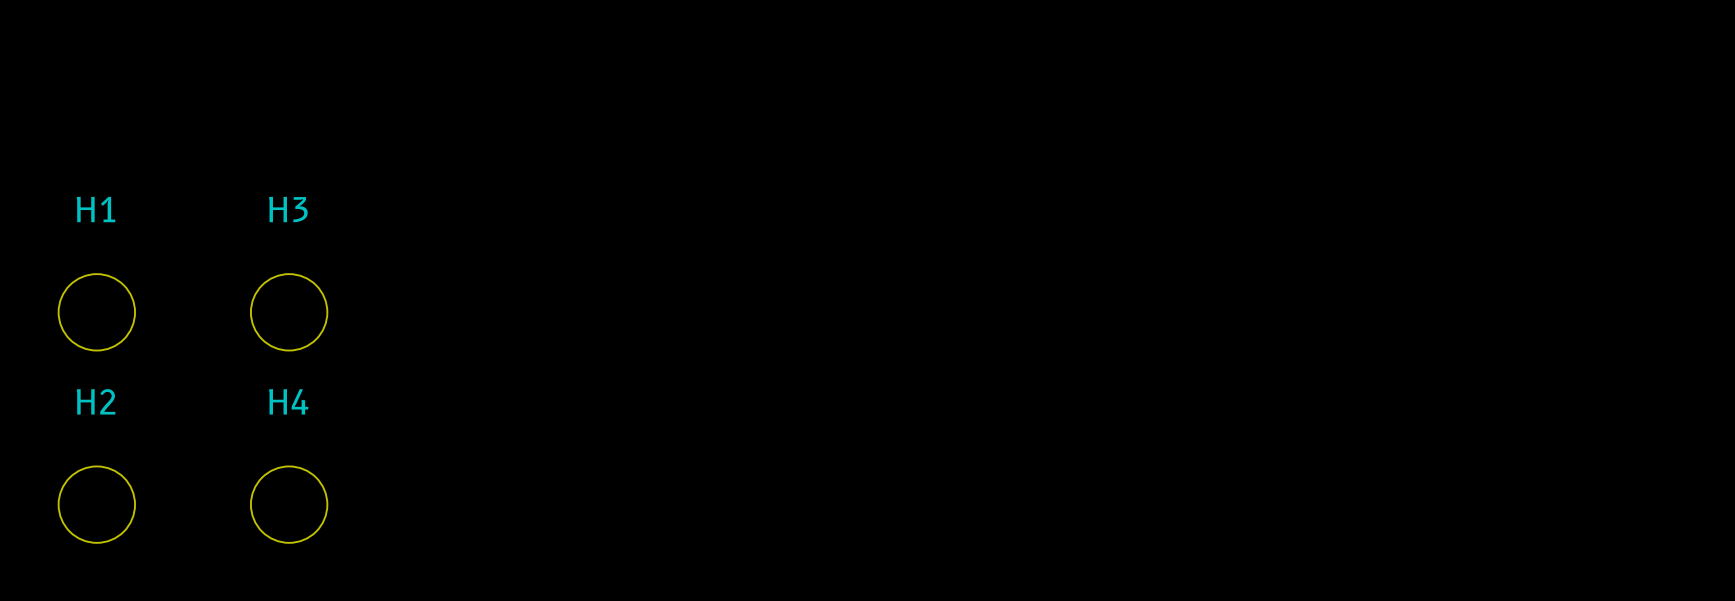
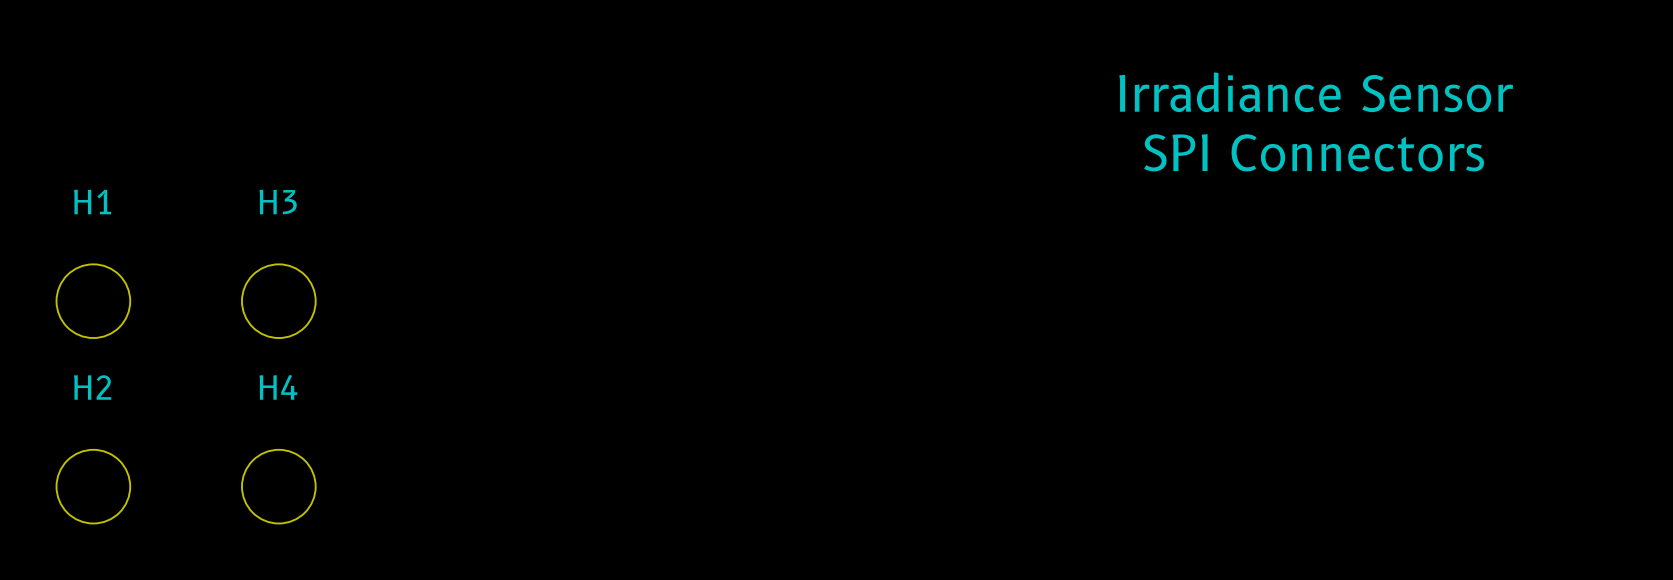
text: none -> Irradiance Sensor (1316, 92)
text: none -> SPI Connectors (1314, 152)

